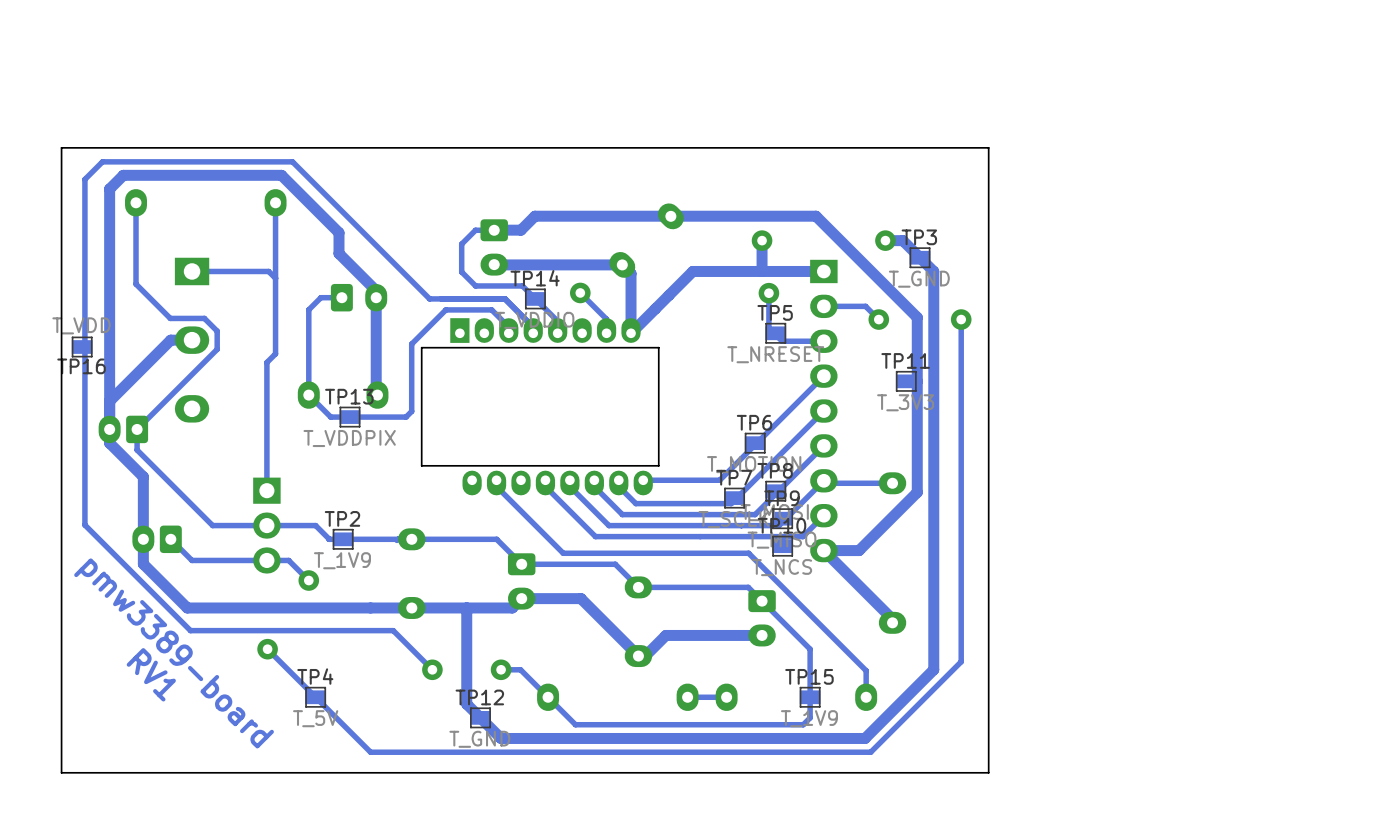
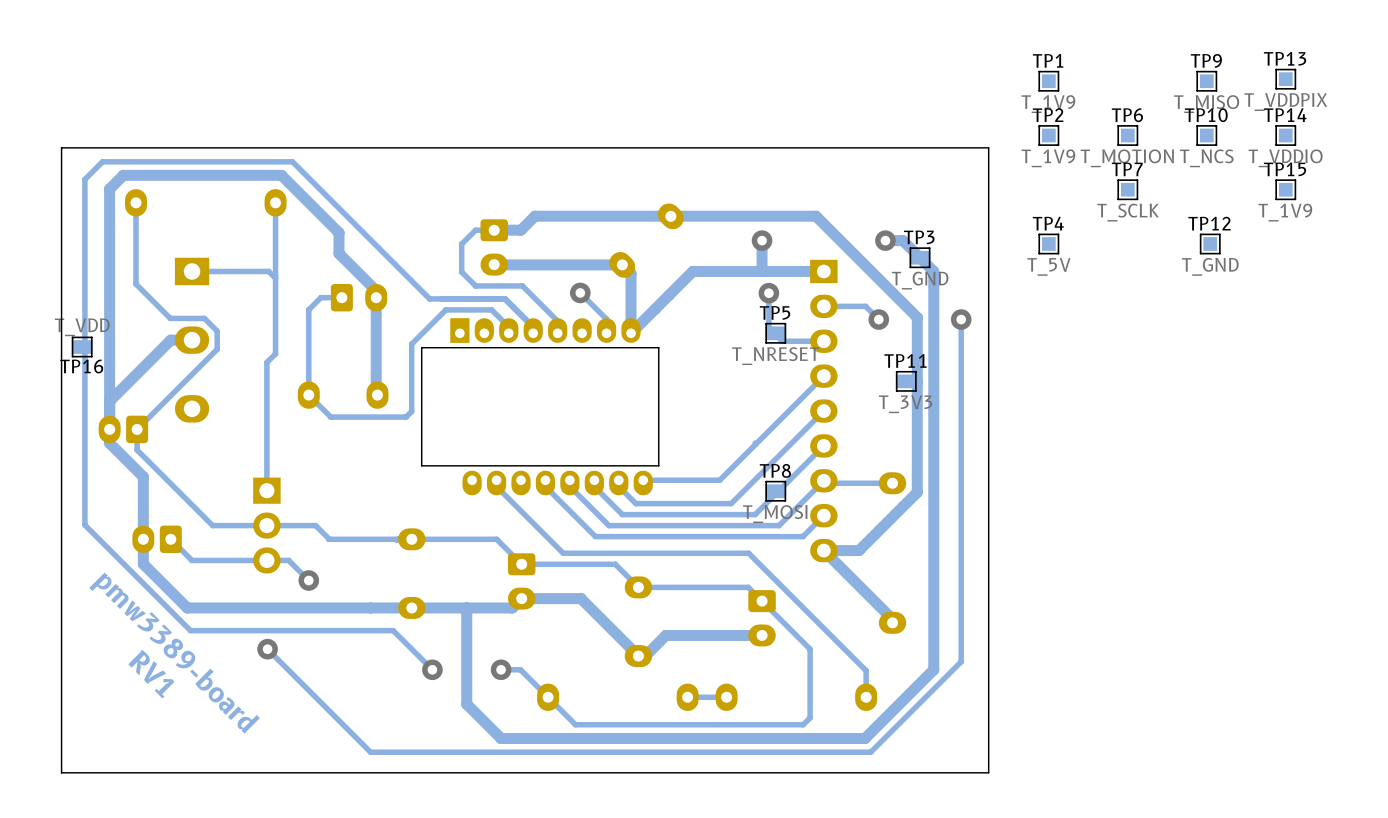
TP1: none -> T_1V9 (1048, 81)
TP14 footprint: [524, 288, 546, 310] -> [1275, 125, 1297, 146]
TP13 footprint: [339, 406, 361, 428] -> [1275, 68, 1297, 90]
TP6 footprint: [744, 432, 766, 454] -> [1117, 125, 1139, 146]
TP7 footprint: [724, 487, 746, 509] -> [1117, 179, 1139, 201]
TP9 footprint: [772, 508, 794, 530] -> [1196, 70, 1218, 92]
TP2 footprint: [332, 528, 354, 550] -> [1038, 125, 1060, 146]
TP10 footprint: [772, 535, 794, 557] -> [1196, 125, 1218, 146]
TP4 footprint: [305, 686, 327, 708] -> [1038, 233, 1060, 255]
TP15 footprint: [799, 686, 821, 708] -> [1275, 179, 1297, 201]
TP12 footprint: [470, 707, 491, 729] -> [1199, 233, 1221, 255]

